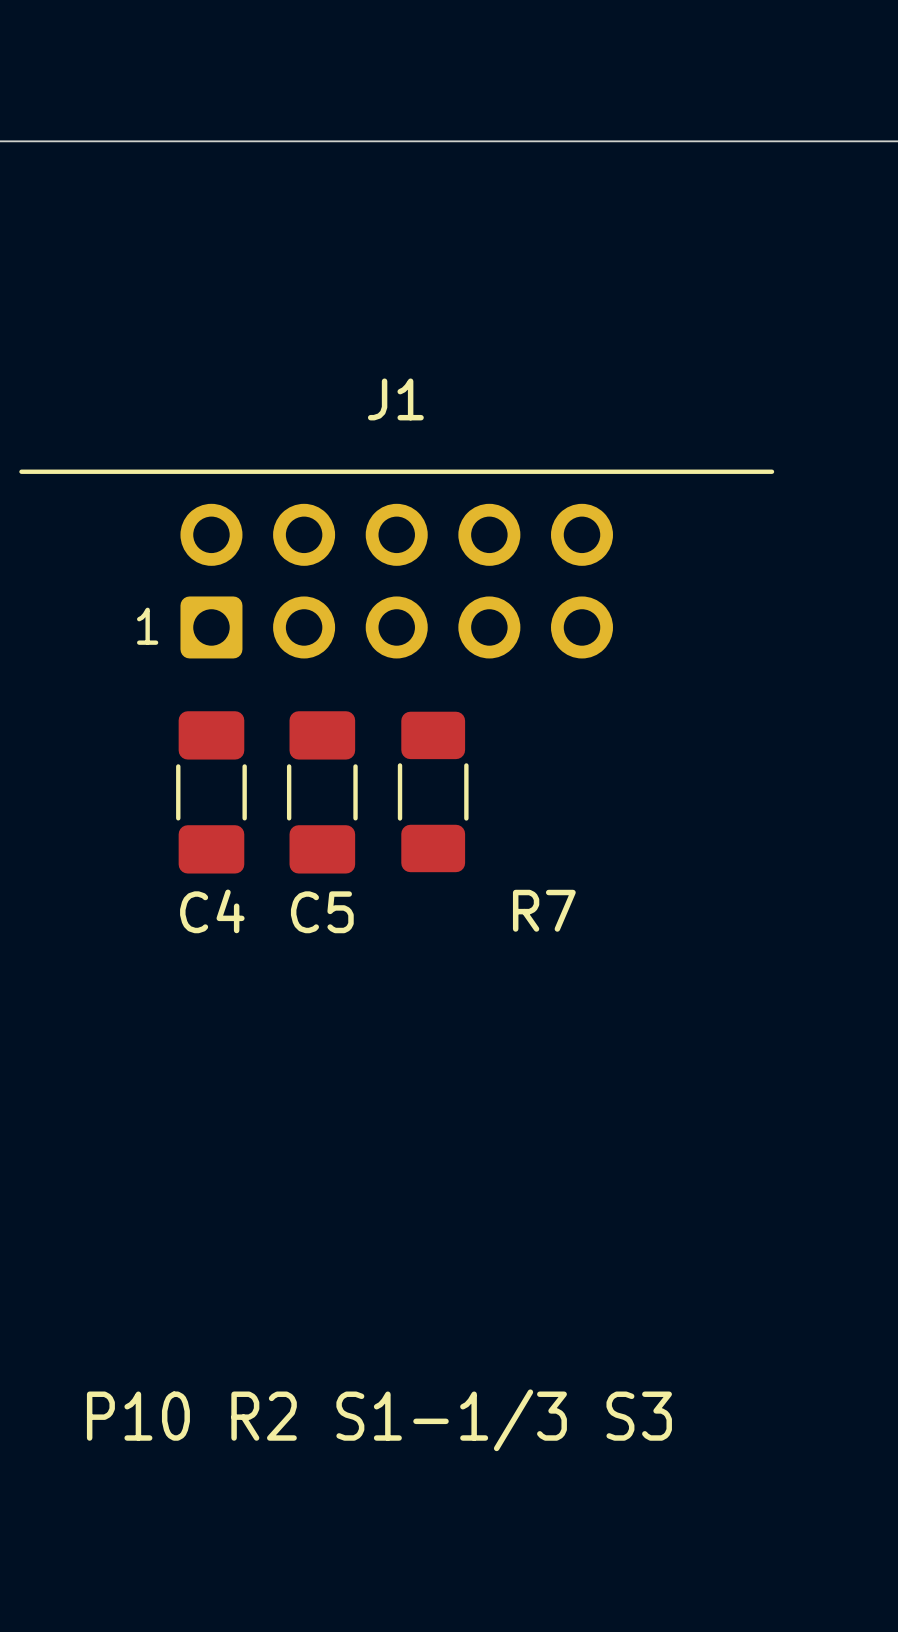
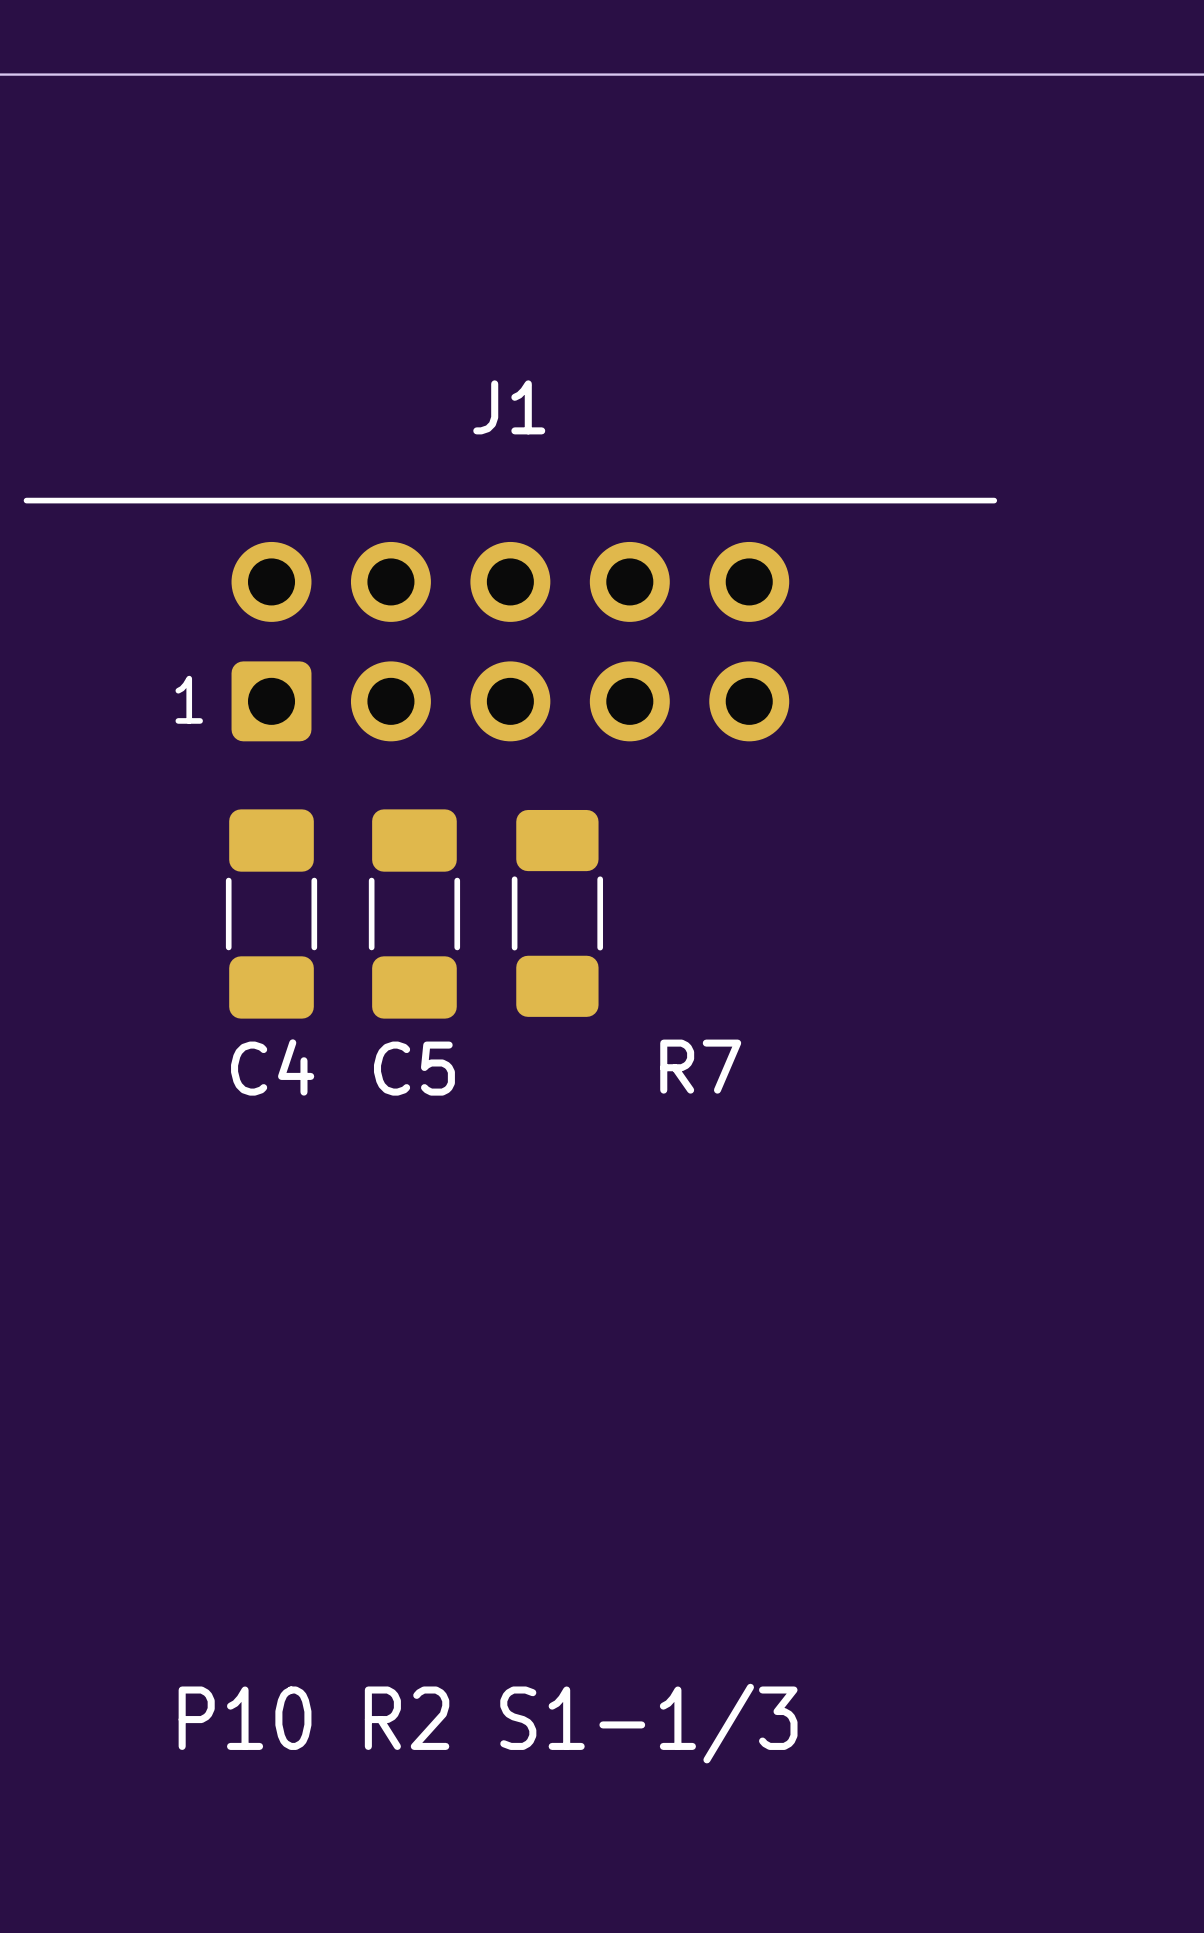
text: P10 R2 S1-1/3 S3 (379, 1420) -> P10 R2 S1-1/3 (488, 1723)

